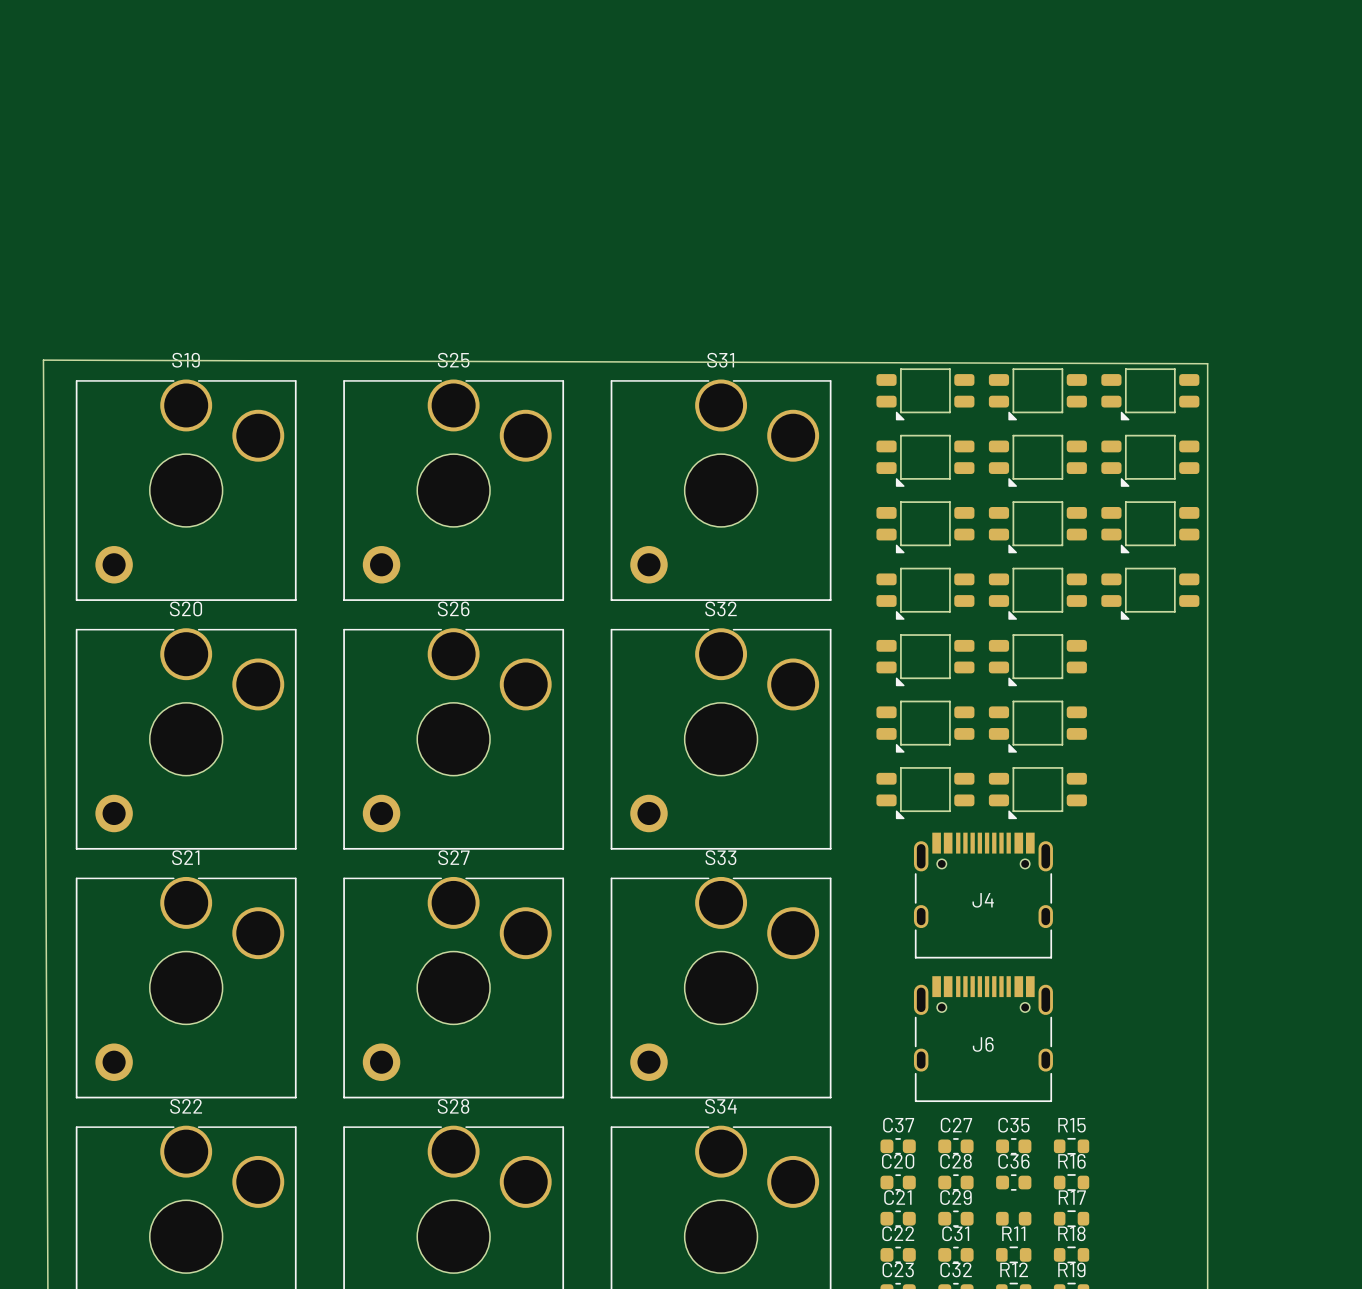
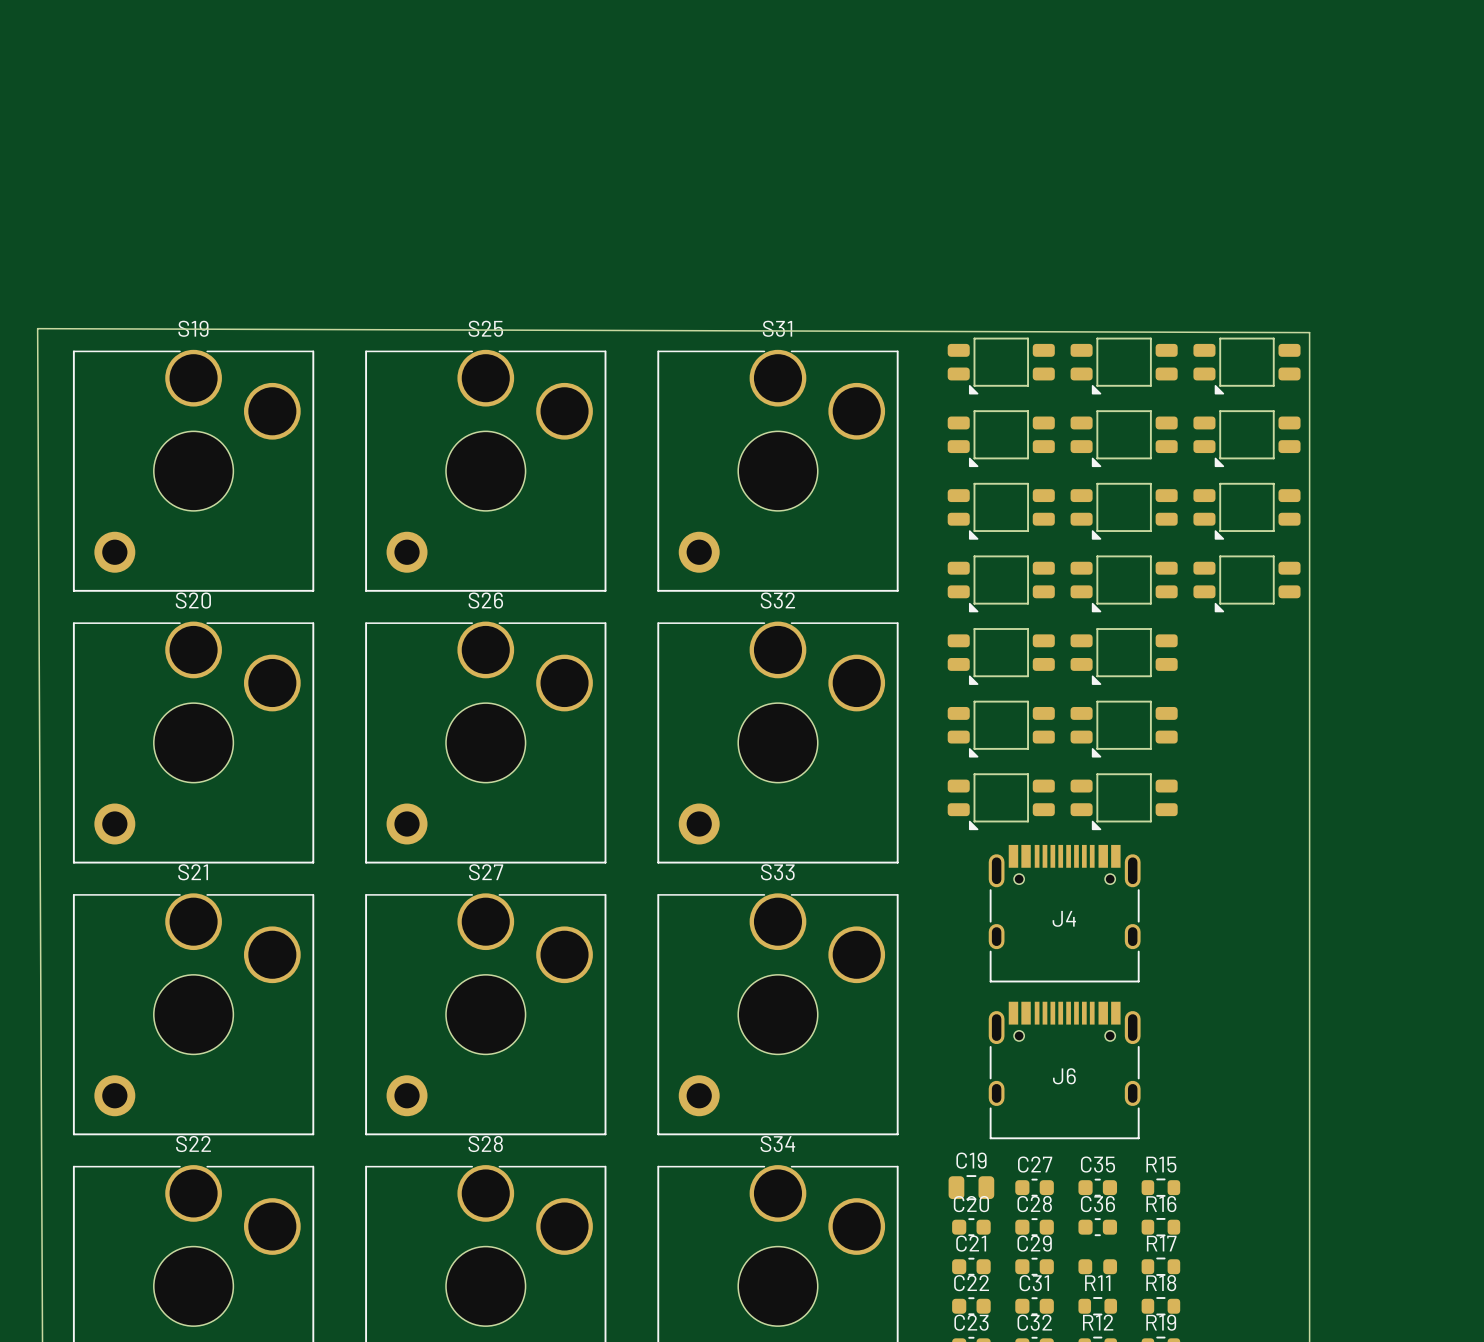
C37: (898, 1146) -> none
C19: none -> (971, 1187)

